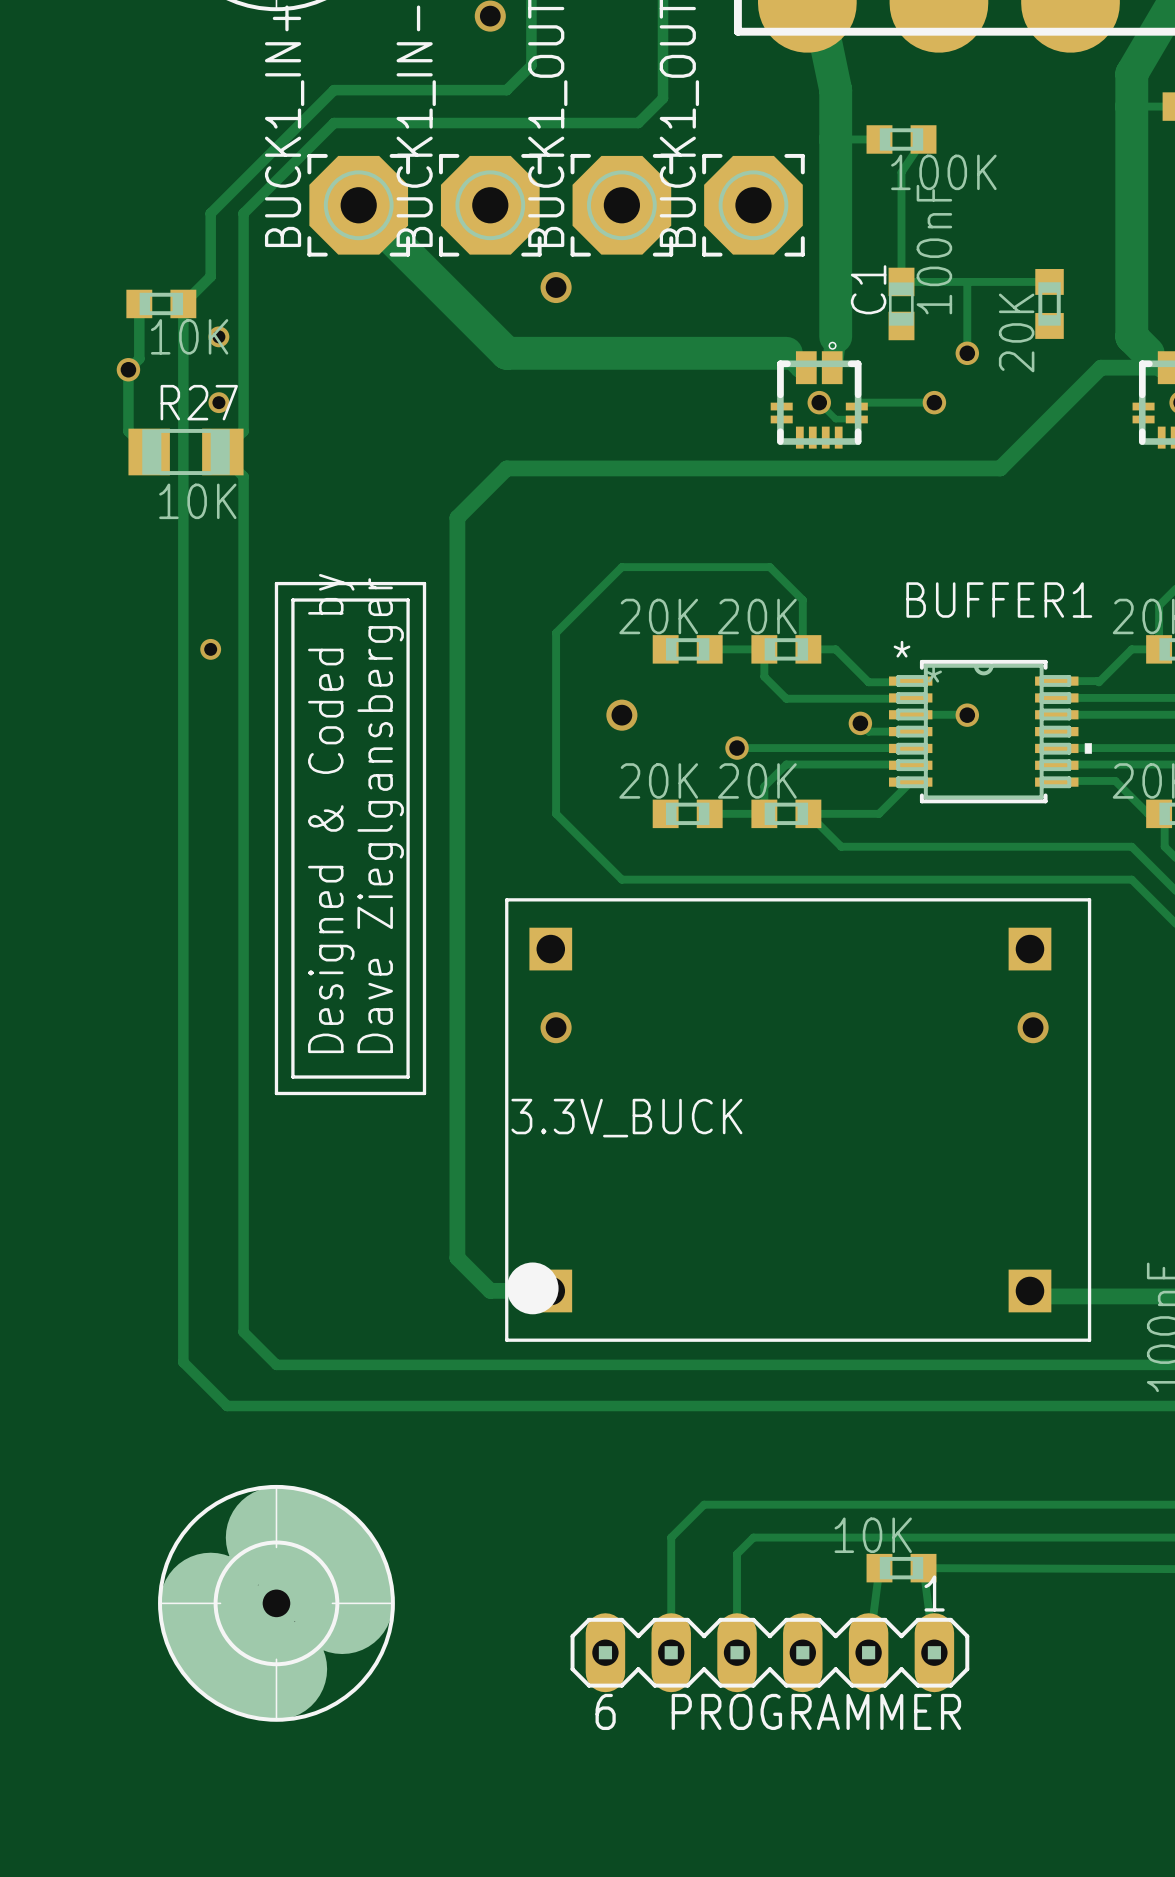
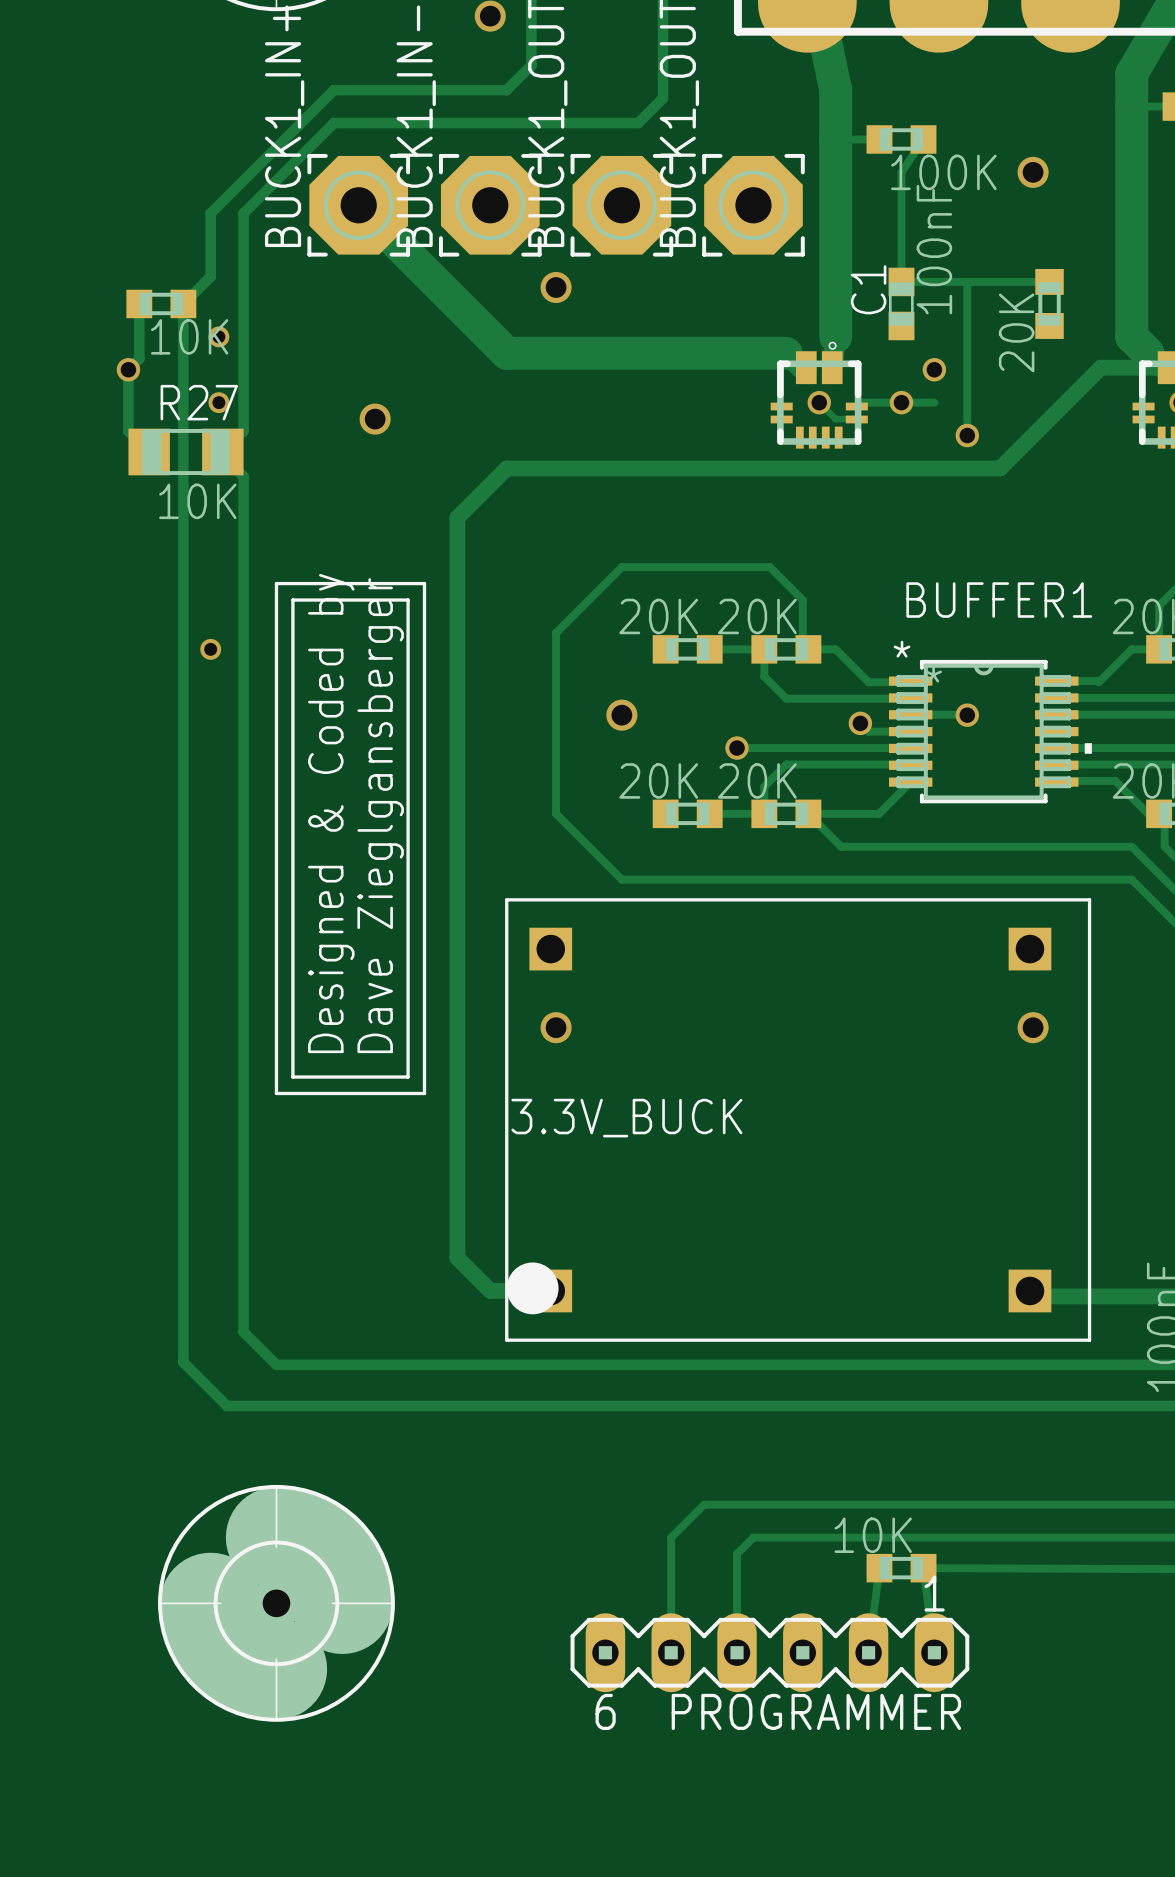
via: none -> (1033, 172)
track: none -> (967, 353) (967, 435)
via: (967, 353) -> none
via: none -> (934, 369)
via: none -> (901, 402)
via: (934, 402) -> none
via: none -> (375, 419)
via: none -> (967, 435)

